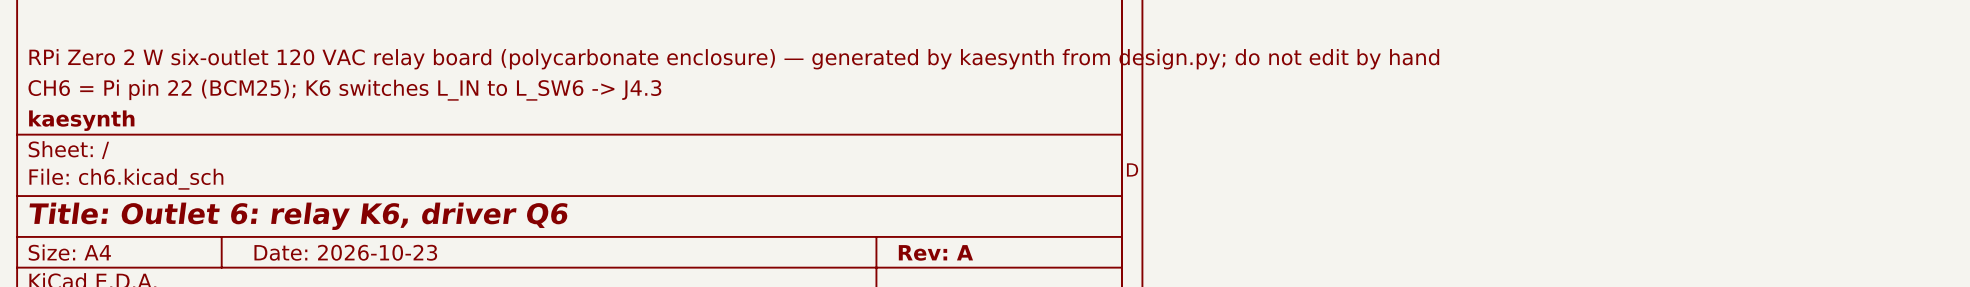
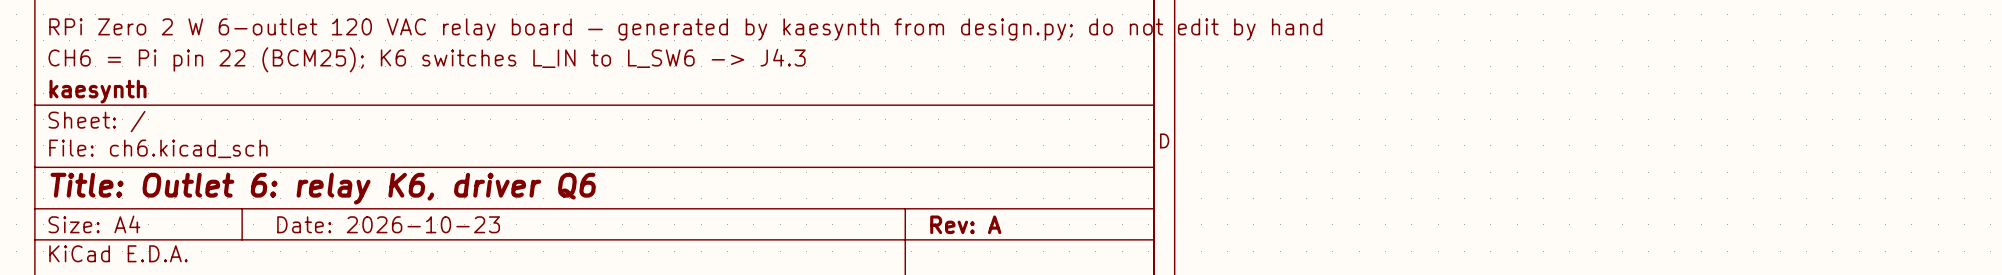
title block: RPi Zero 2 W six-outlet 120 VAC relay board (polycarbonate enclosure) — generated by kaesynth from design.py; do not edit by hand (734, 59) -> RPi Zero 2 W 6-outlet 120 VAC relay board — generated by kaesynth from design.py; do not edit by hand (685, 29)

